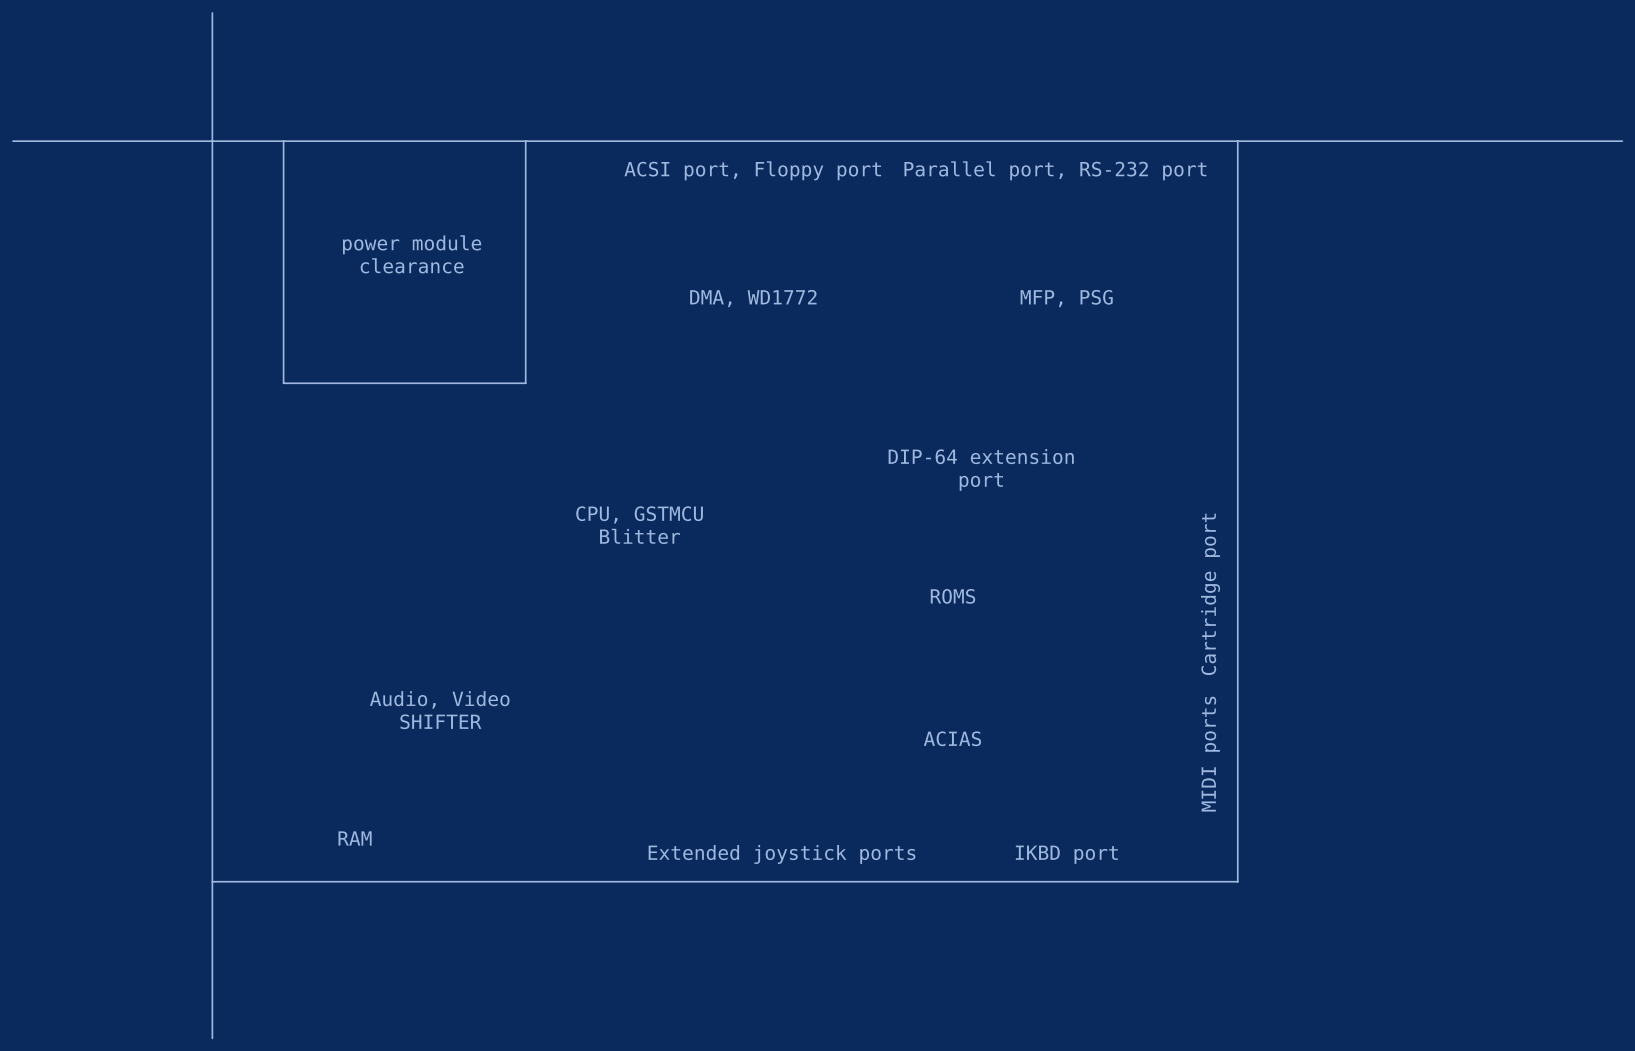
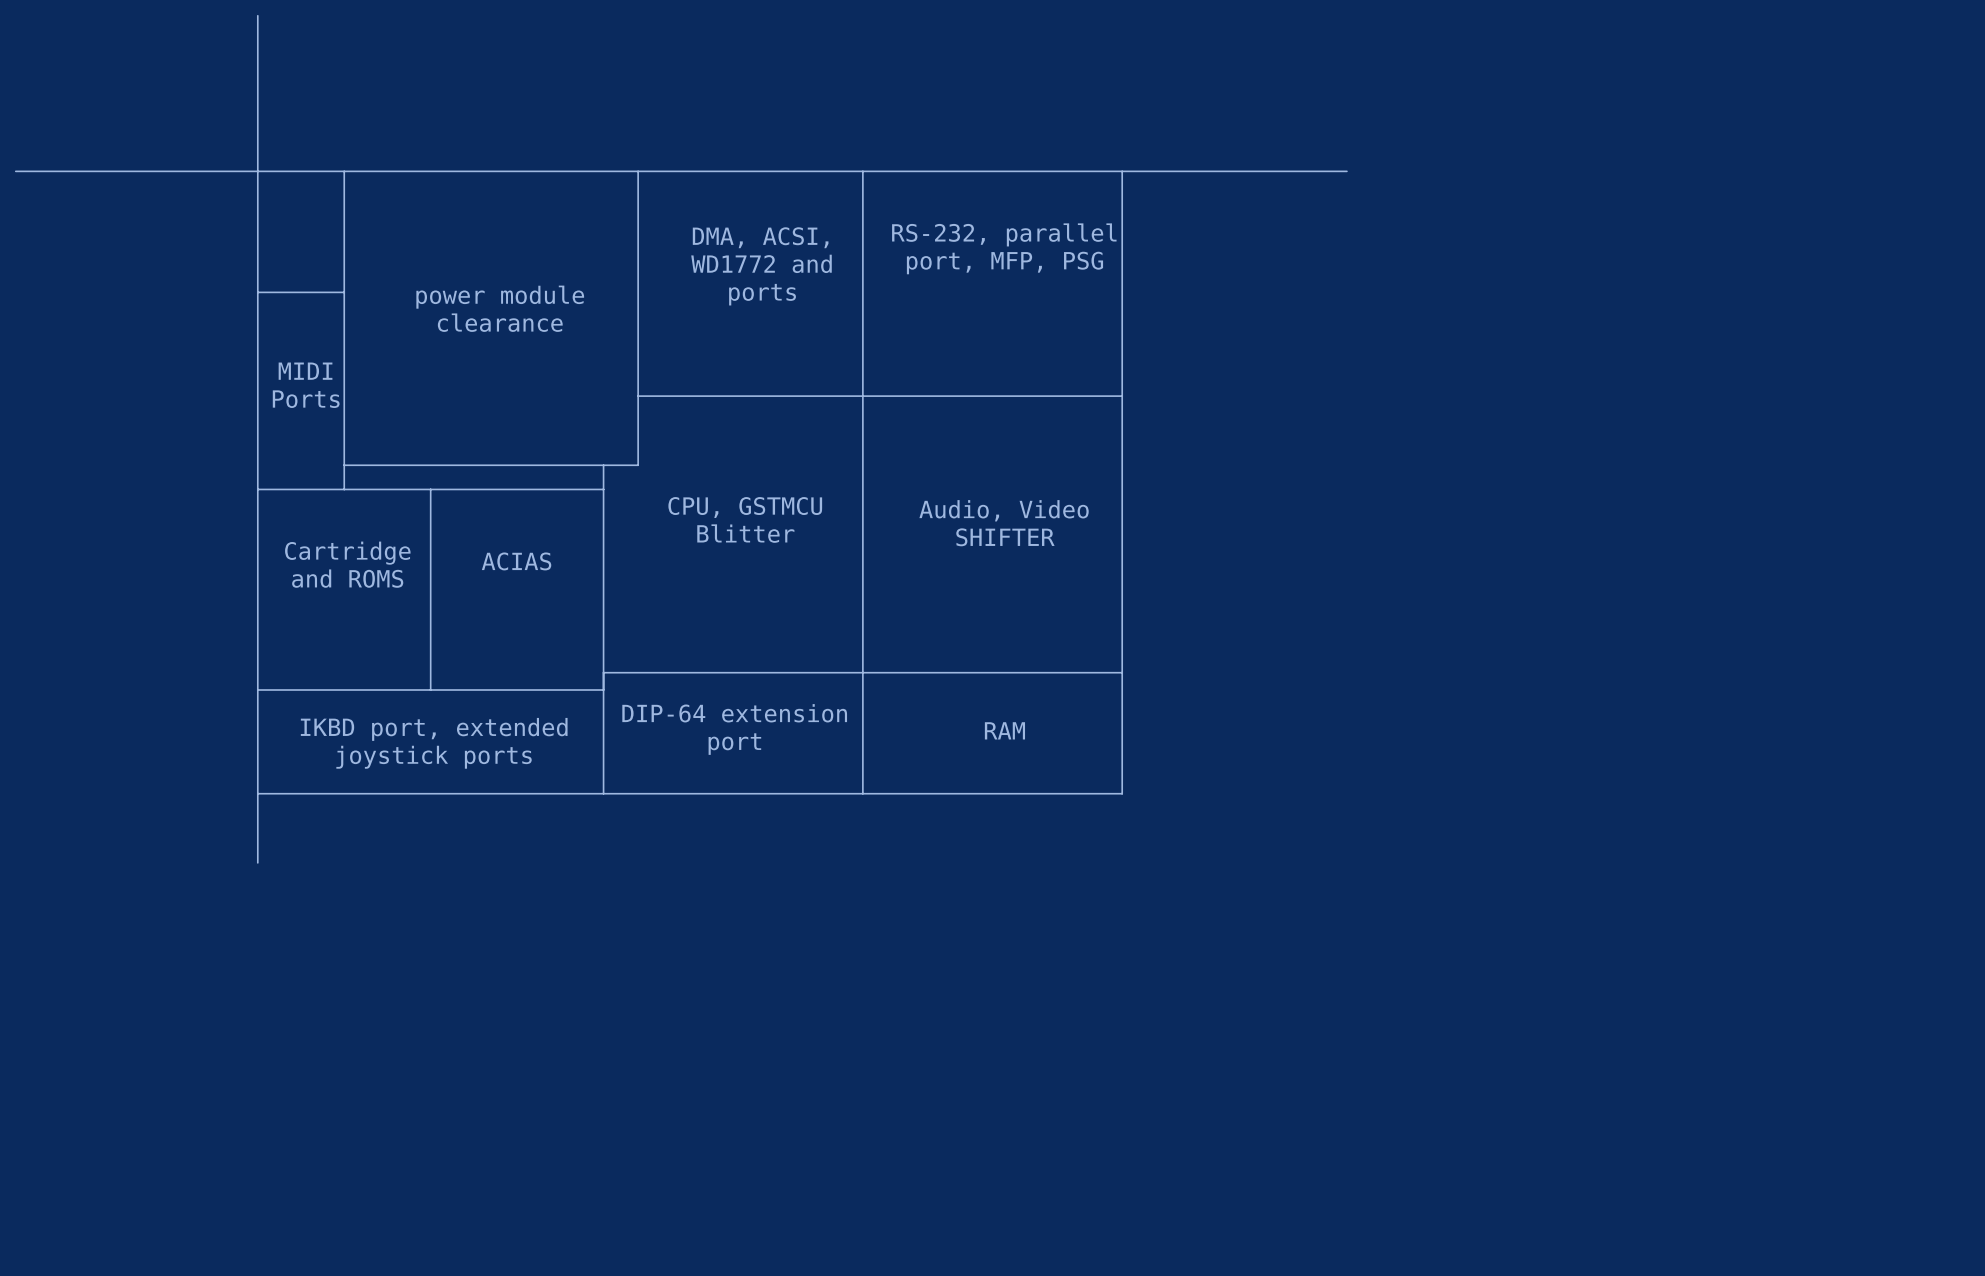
line: none -> (862, 171) (862, 793)
line: none -> (1122, 171) (1122, 793) (257, 793)
line: (1109, 141) (1622, 141) -> none
line: (1237, 141) (1237, 881) (212, 881) -> none
text: ACSI port, Floppy port (752, 170) -> none
text: Parallel port, RS-232 port (1055, 170) -> none
text: none -> RS-232, parallel (1004, 234)
text: none -> DMA, ACSI, (760, 237)
text: none -> port, MFP, PSG (1004, 263)
text: none -> WD1772 and (761, 263)
line: none -> (257, 292) (344, 292)
text: none -> ports (762, 294)
text: DMA, WD1772 (753, 298) -> none
text: MFP, PSG (1066, 298) -> none
text: none -> MIDI (305, 371)
line: none -> (638, 396) (1122, 396)
text: none -> Ports (306, 399)
line: none -> (344, 465) (344, 489)
line: none -> (603, 465) (603, 793)
line: none -> (257, 489) (603, 489)
line: none -> (430, 489) (430, 690)
text: none -> CPU, GSTMCU (745, 507)
text: none -> Audio, Video (1004, 510)
text: none -> Blitter (745, 533)
text: none -> SHIFTER (1005, 537)
text: none -> Cartridge (347, 553)
text: DIP-64 extension (981, 456) -> none
text: none -> ACIAS (516, 561)
text: none -> and ROMS (347, 578)
text: port (981, 481) -> none
text: CPU, GSTMCU (639, 514) -> none
text: Blitter (640, 536) -> none
line: none -> (603, 672) (1122, 672)
line: none -> (257, 690) (603, 690)
text: none -> DIP-64 extension (734, 713)
text: Cartridge port (1210, 594) -> none
text: ROMS (952, 596) -> none
text: none -> IKBD port, extended (434, 729)
text: none -> RAM (1004, 730)
text: none -> port (734, 744)
text: none -> joystick ports (434, 757)
text: Audio, Video (439, 699) -> none
line: (212, 710) (212, 1038) -> none
text: SHIFTER (440, 721) -> none
text: ACIAS (952, 738) -> none
text: MIDI ports (1210, 754) -> none
text: RAM (355, 838) -> none
text: Extended joystick ports (782, 854) -> none
text: IKBD port (1066, 854) -> none

